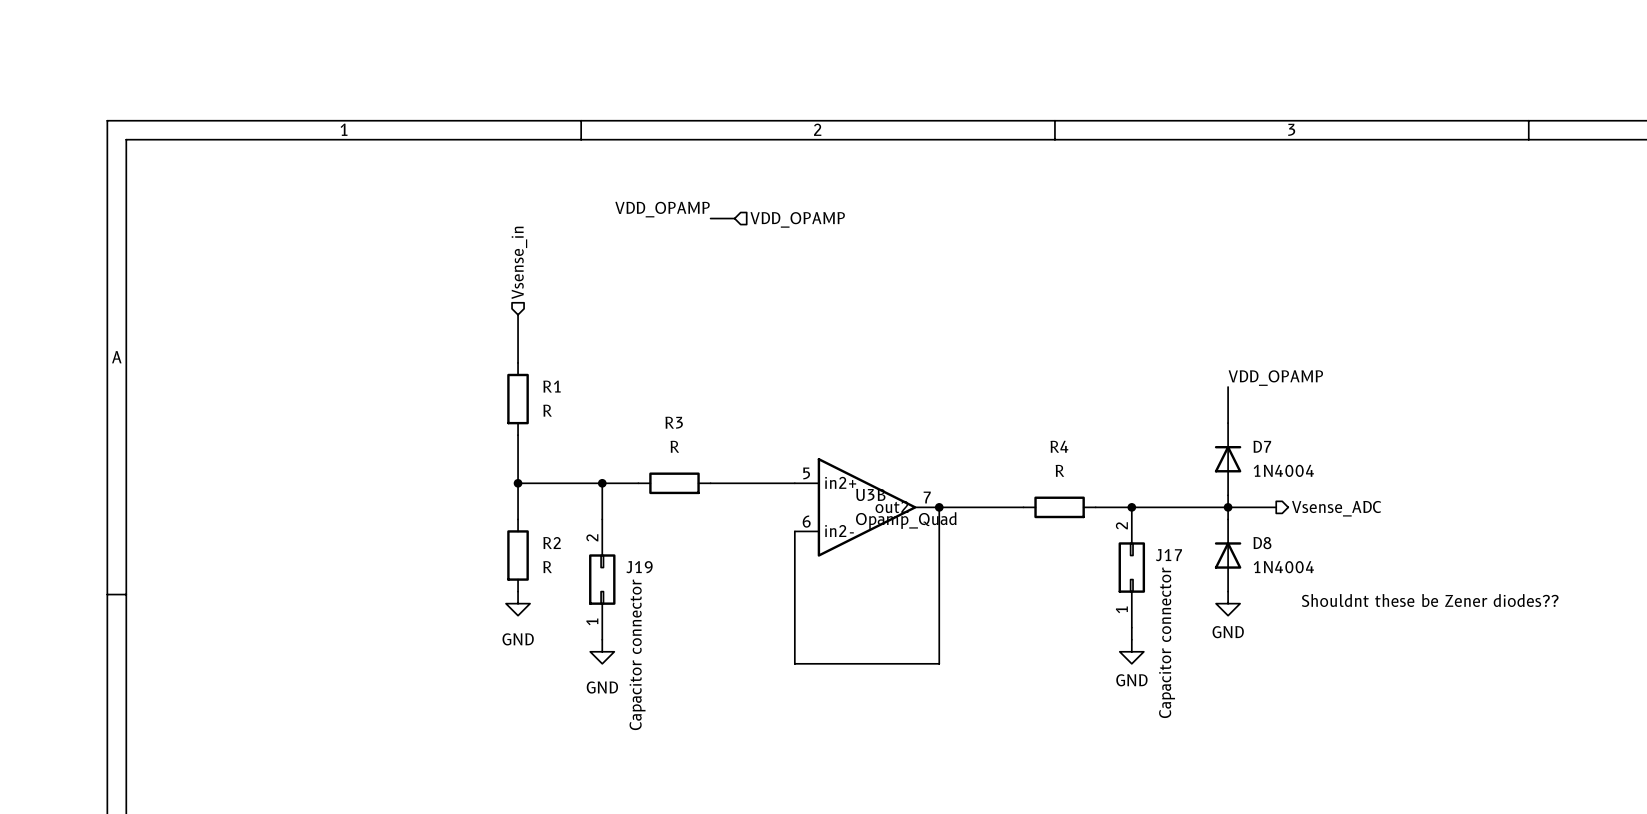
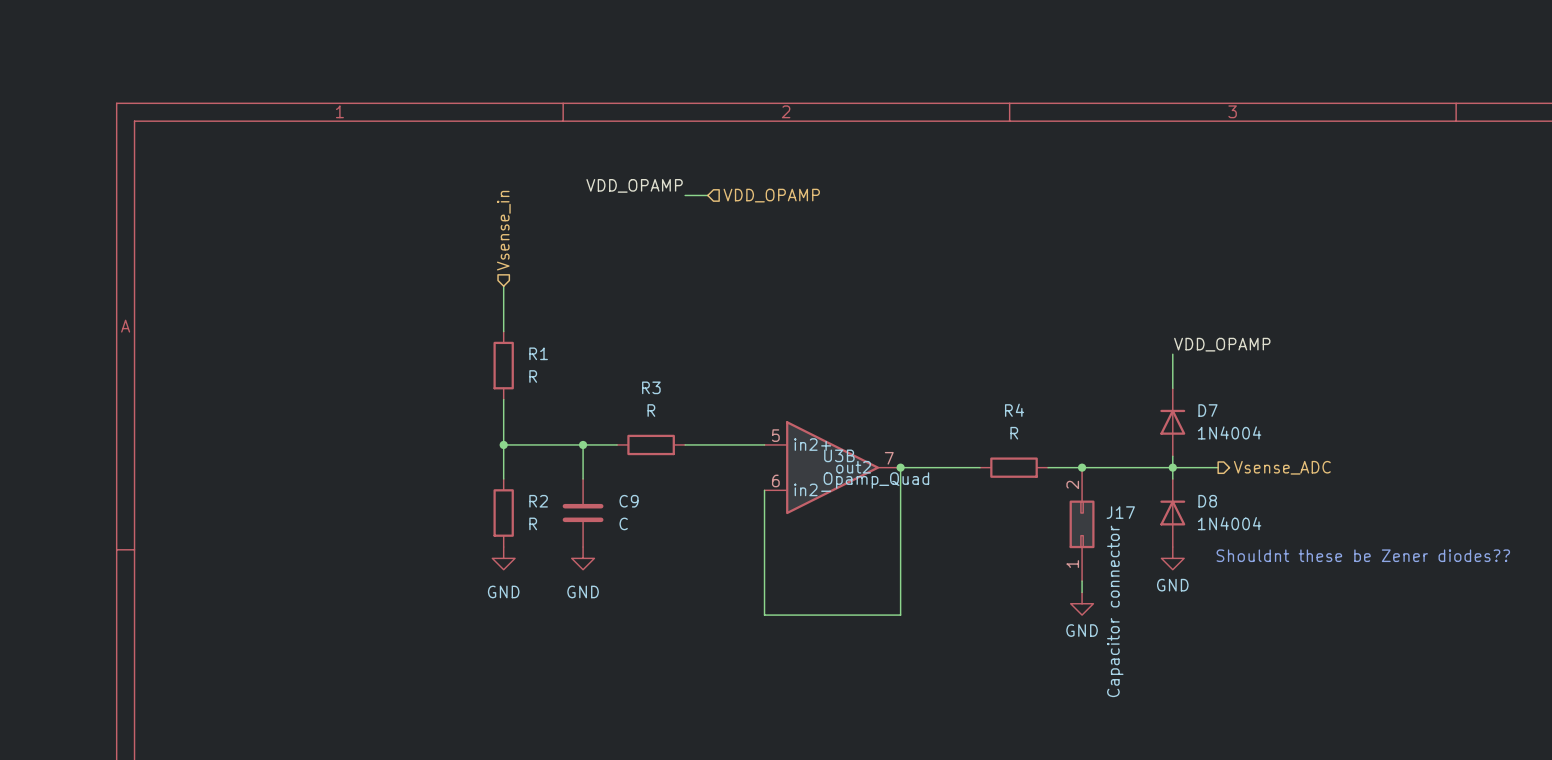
C9: none -> C (583, 513)
J19: Capacitor connector (602, 579) -> none
power symbol position: GND (602, 651) -> GND (583, 558)

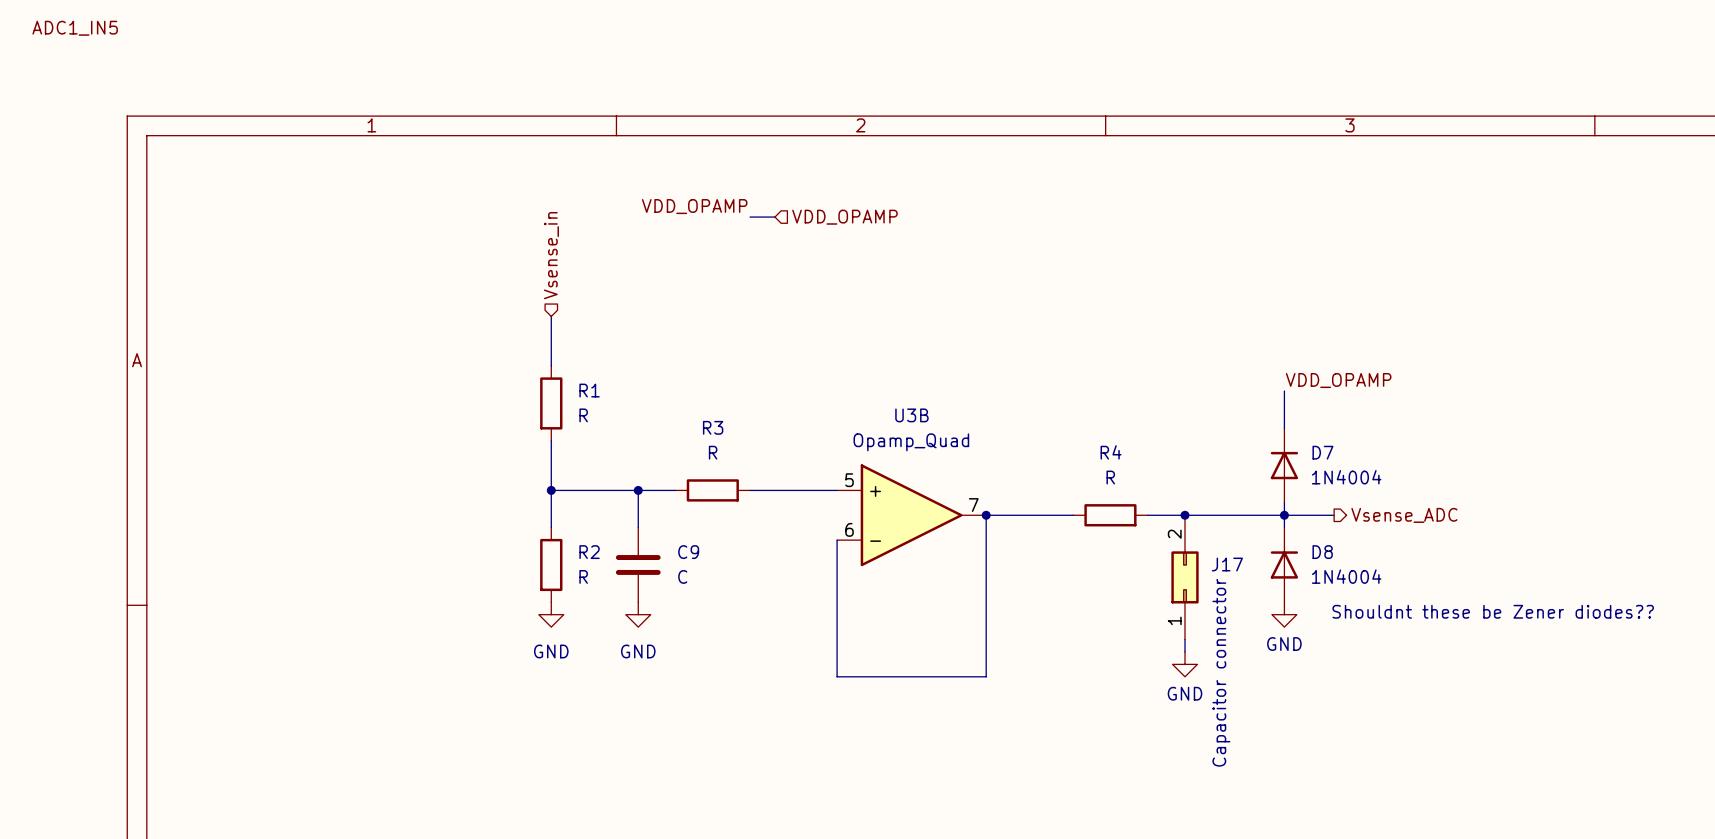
label: none -> ADC1_IN5 (75, 28)
U3B pin name: in2+ (812, 444) -> + (875, 491)
U3B name position: U3B (839, 455) -> U3B (911, 415)
U3B pin name: out2 (853, 467) -> none
U3B value position: Opamp_Quad (876, 480) -> Opamp_Quad (911, 442)
U3B pin name: in2- (812, 489) -> - (875, 541)

